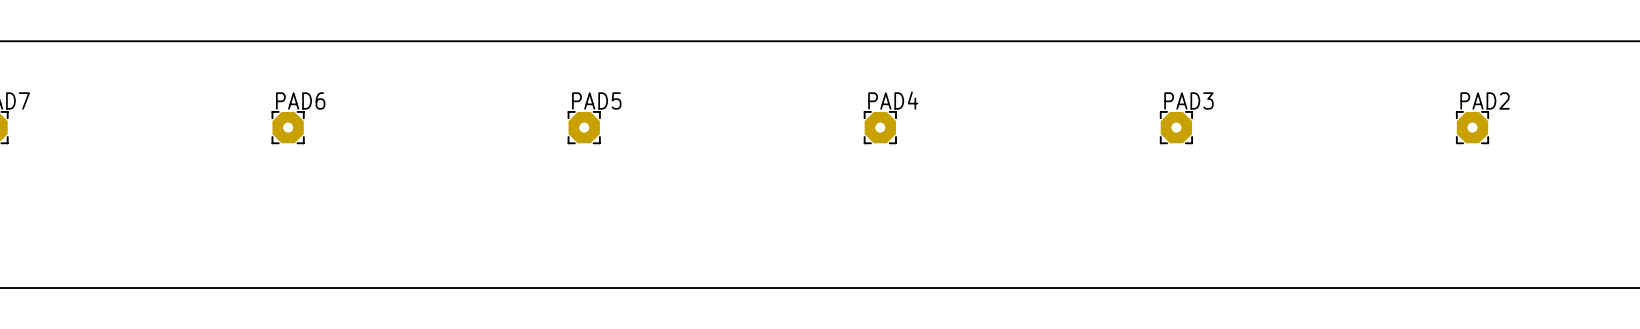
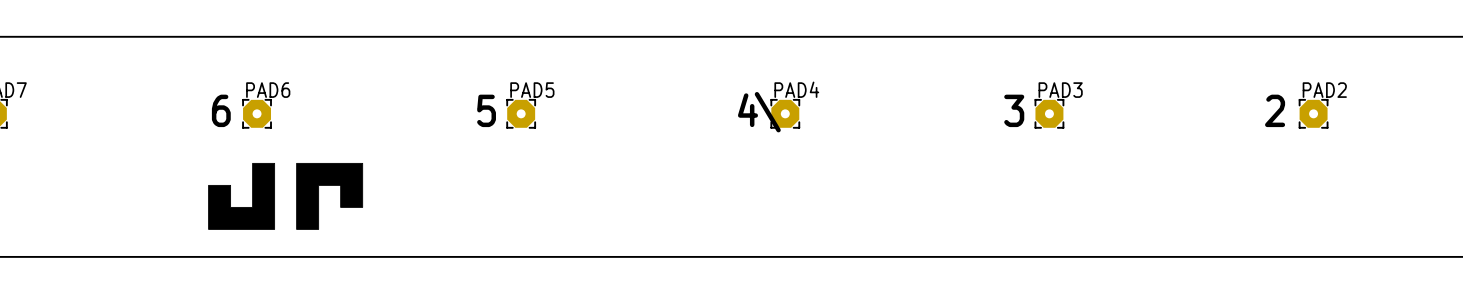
text: none -> 6 (221, 110)
text: none -> 5 (486, 110)
text: none -> 3 (1014, 110)
text: none -> 2 (1275, 110)
text: none -> 4\ (759, 112)
drawing: none -> [208, 162, 276, 230]
drawing: none -> [296, 162, 364, 230]

